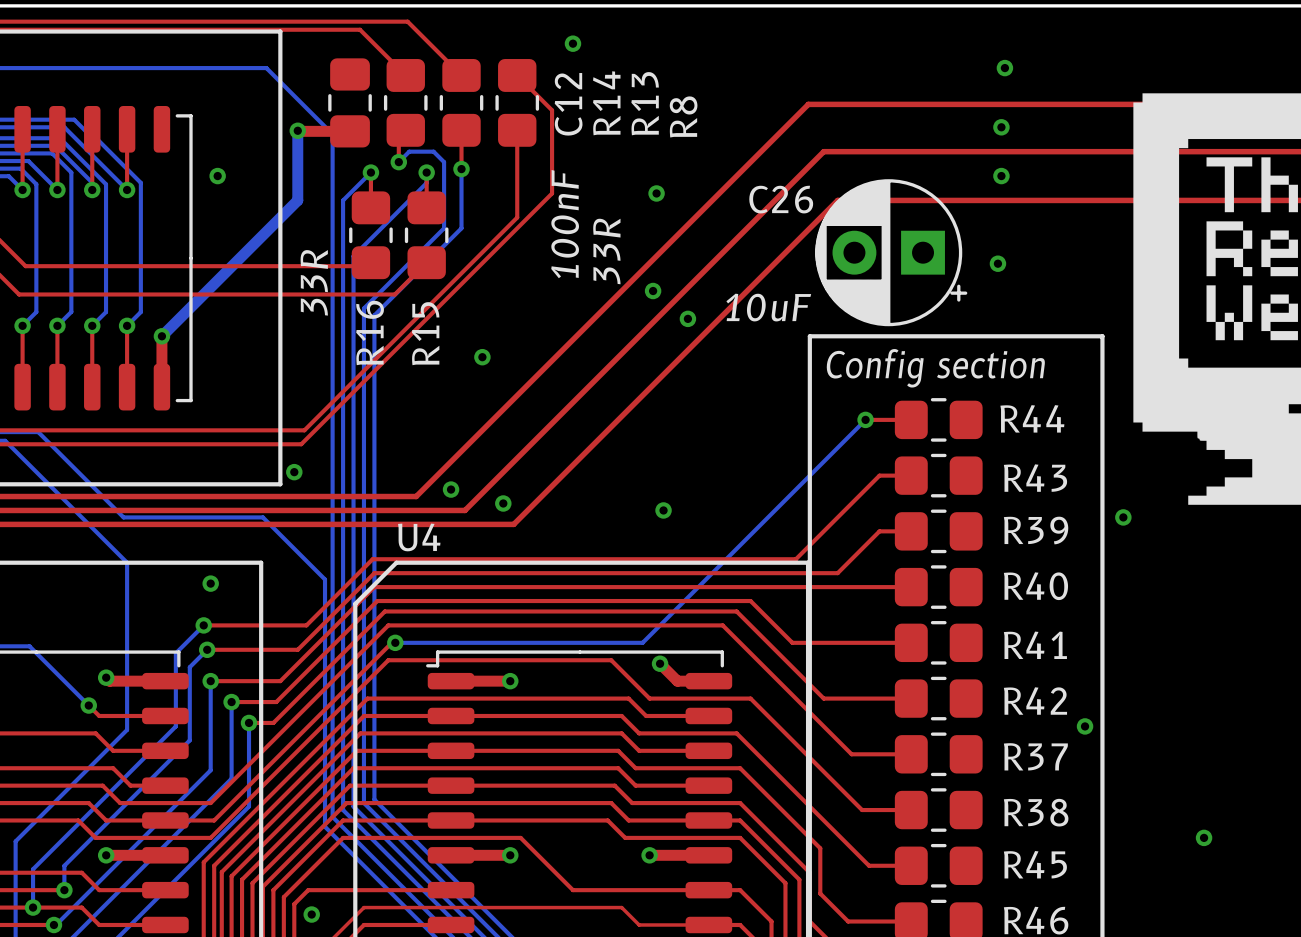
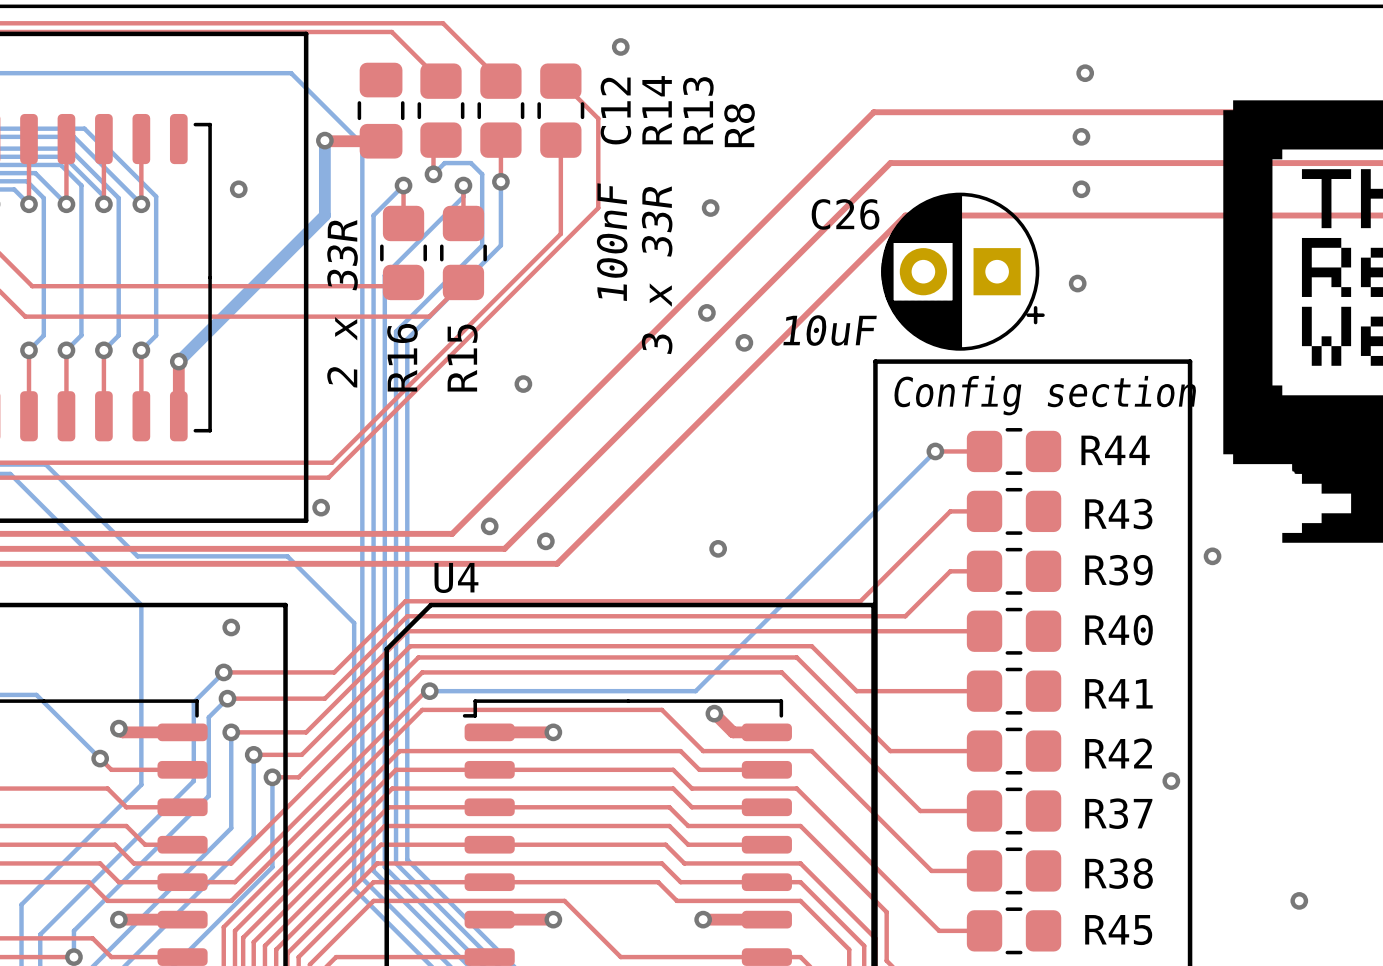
R13 value: 33R (606, 251) -> 3 x 33R (657, 270)
R16 value: 33R (314, 282) -> 2 x 33R (342, 303)

